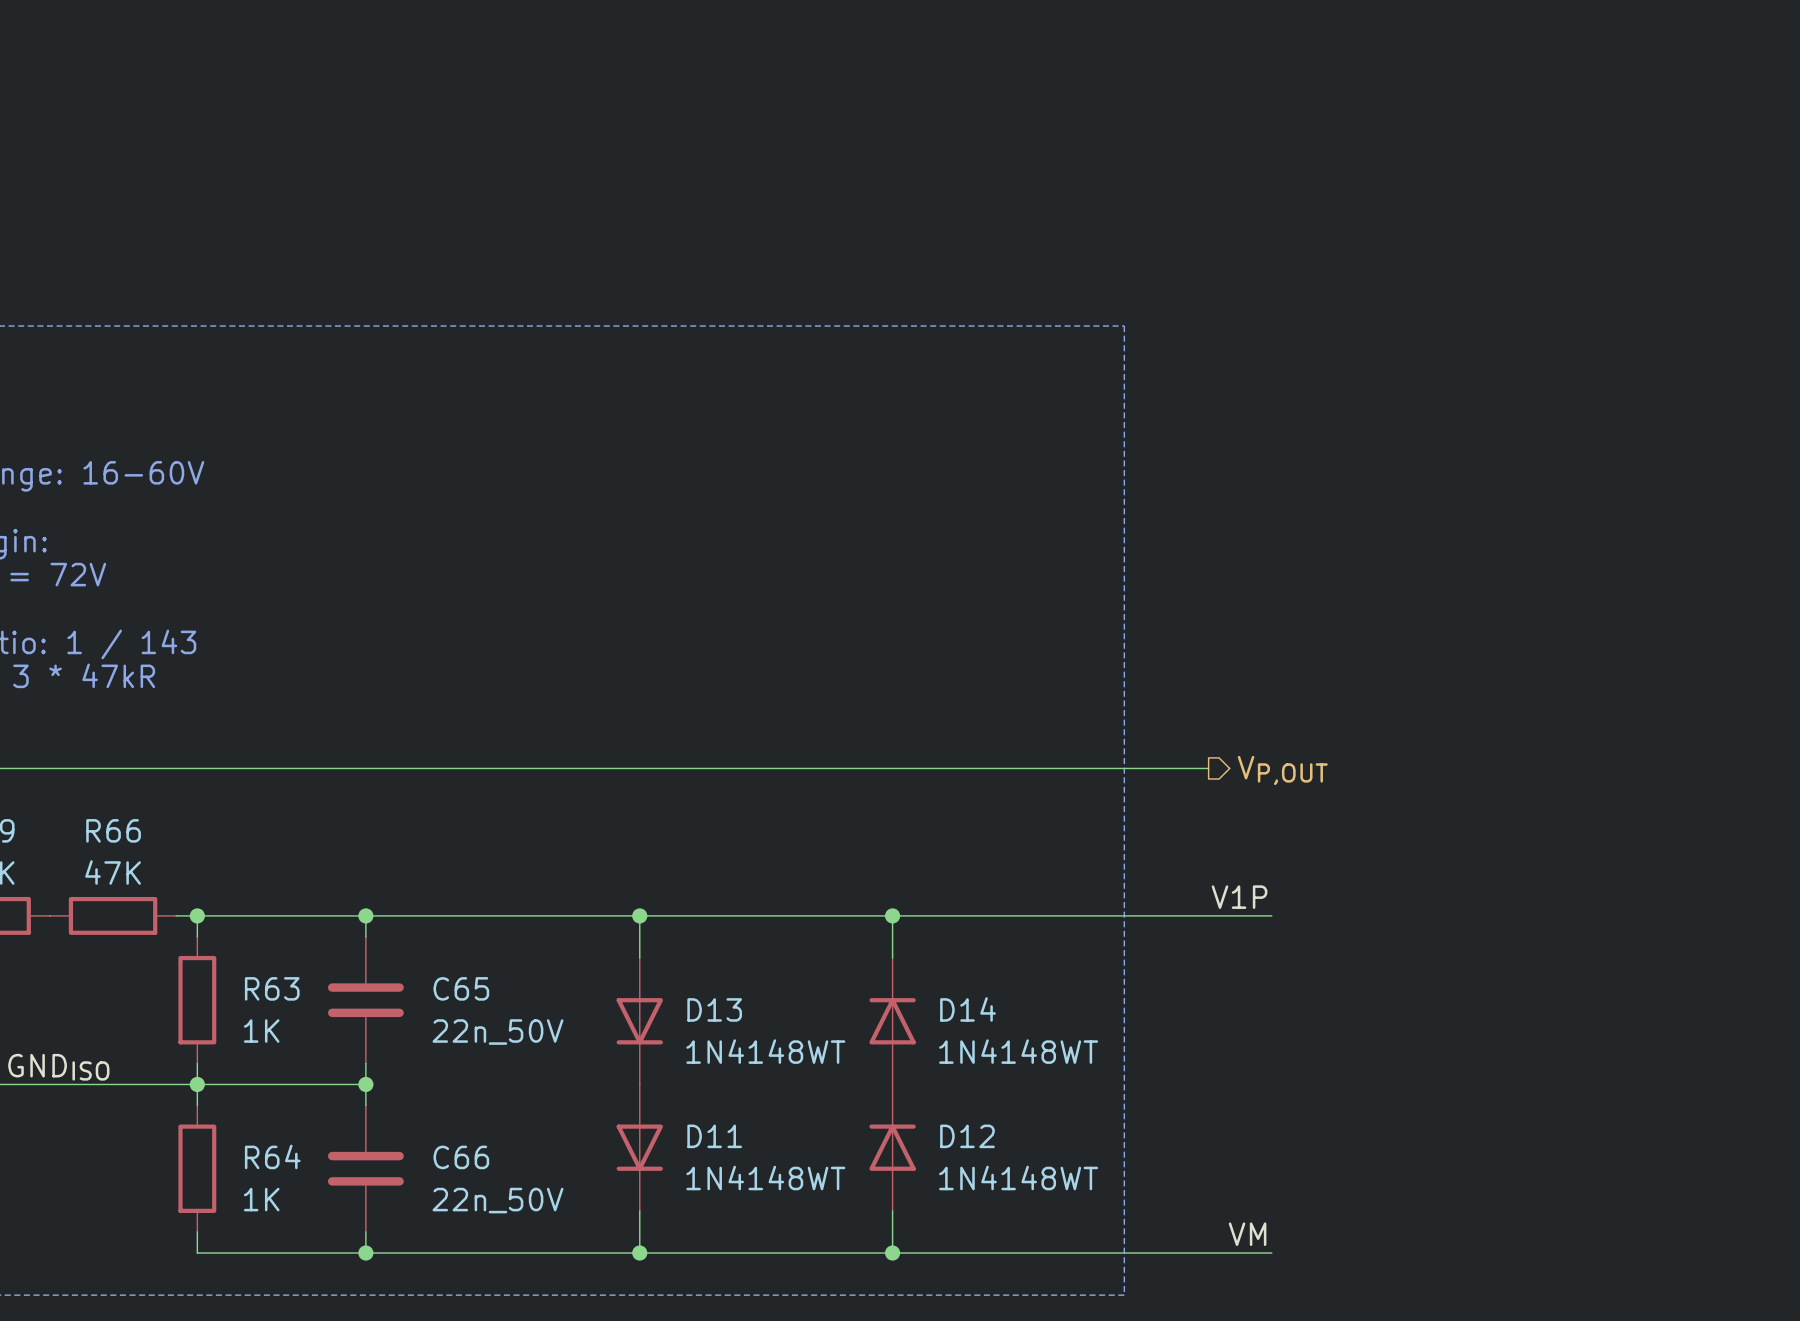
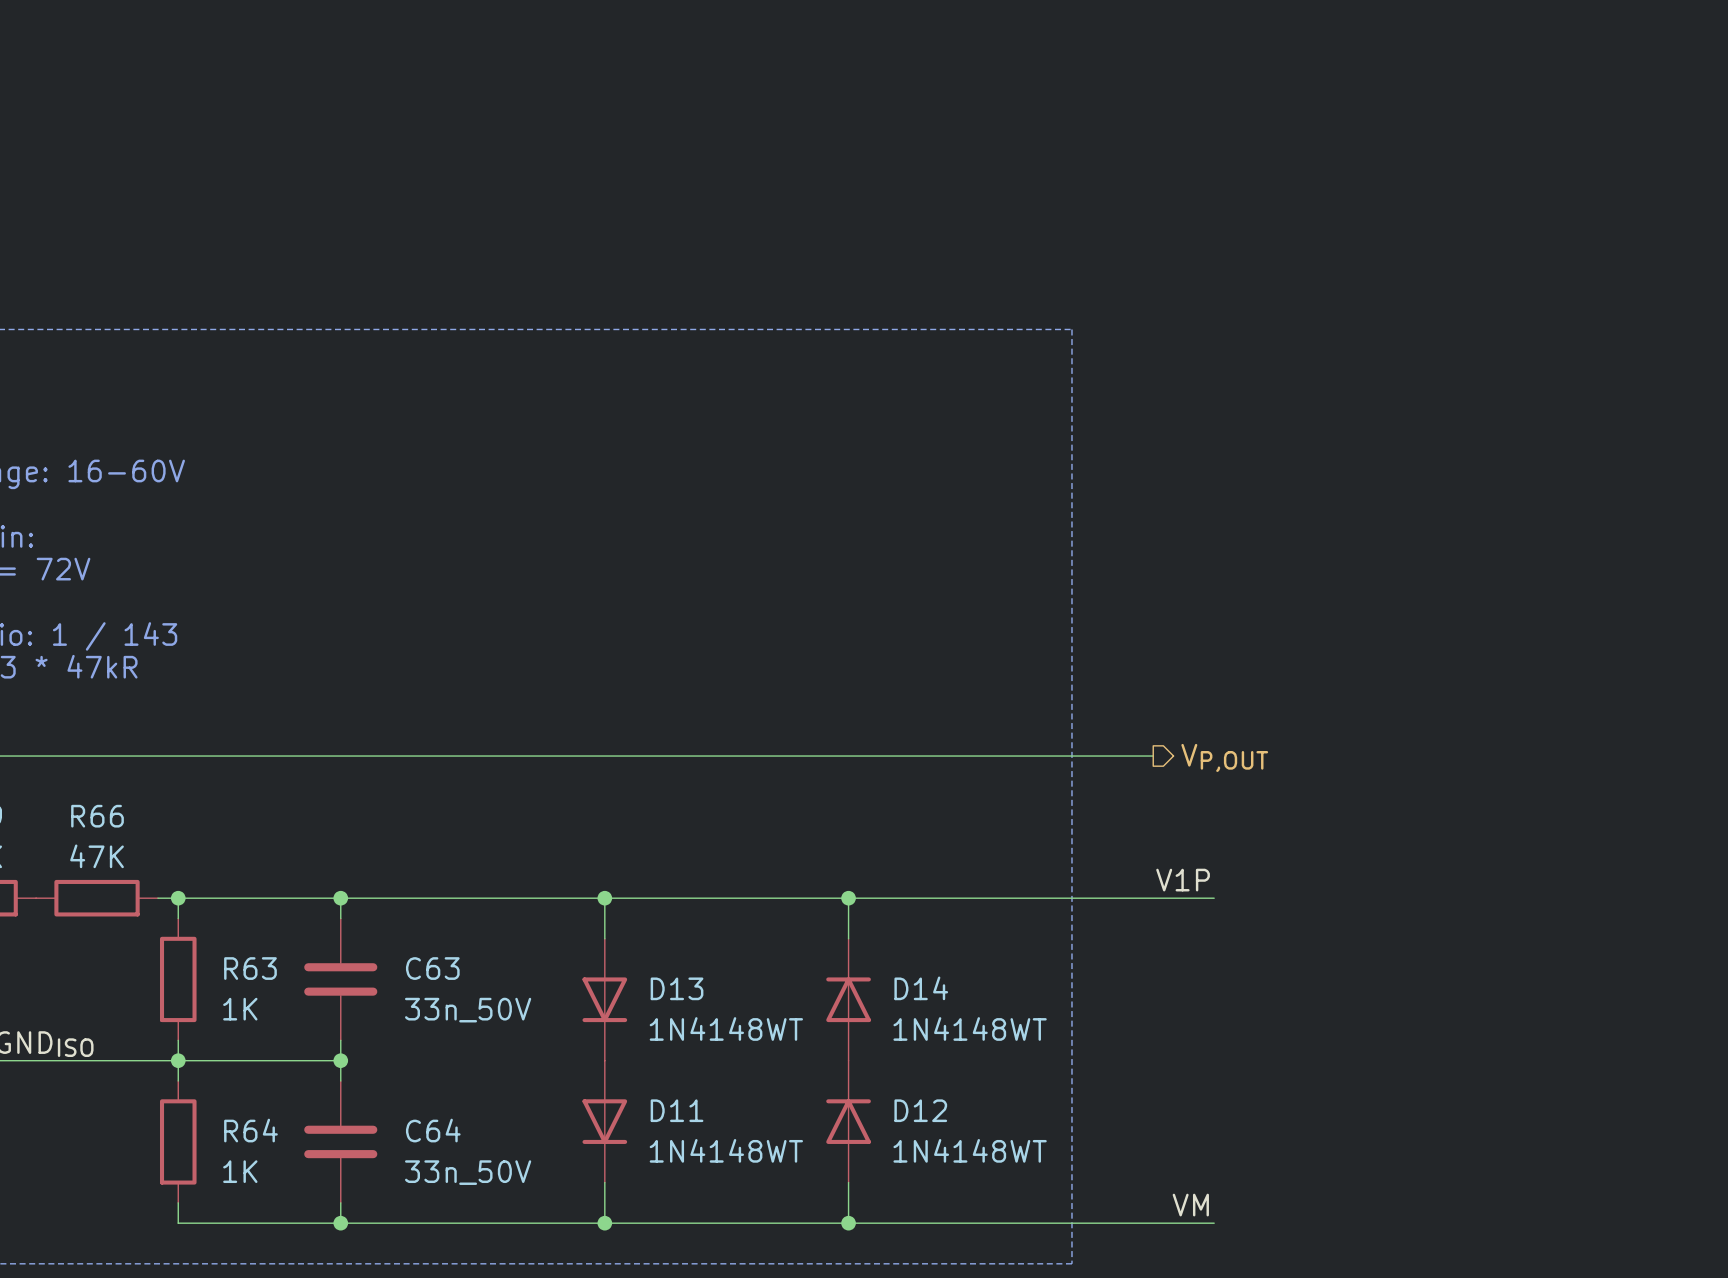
C65 name: C65 (461, 988) -> C63 (432, 968)
C65 value: 22n_50V (497, 1032) -> 33n_50V (468, 1010)
C66 name: C66 (461, 1157) -> C64 (433, 1130)
C66 value: 22n_50V (497, 1200) -> 33n_50V (468, 1172)

